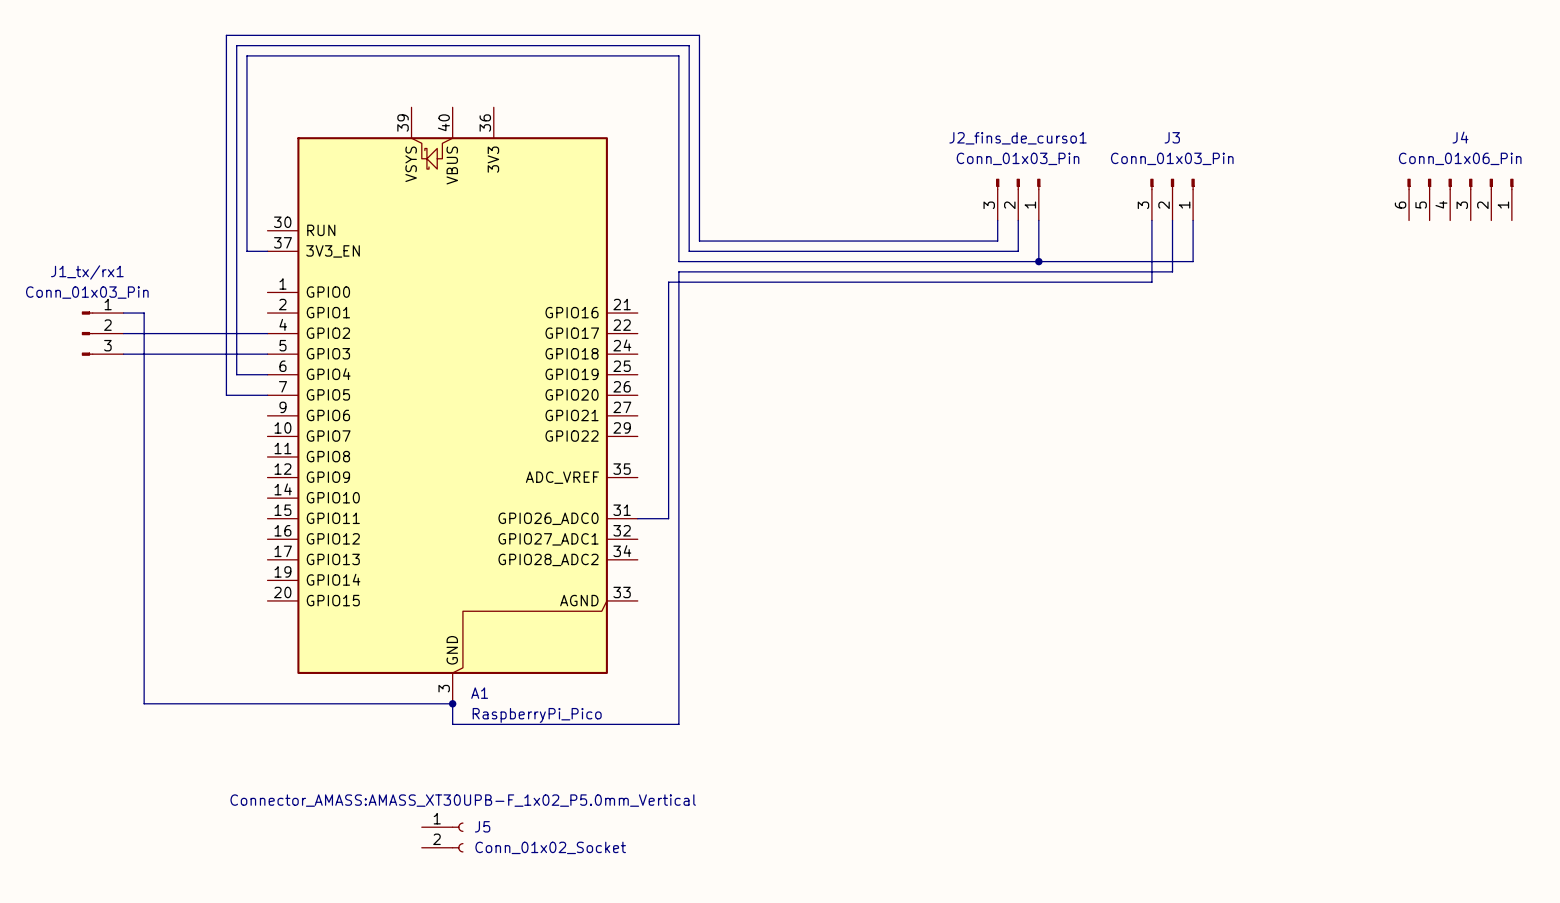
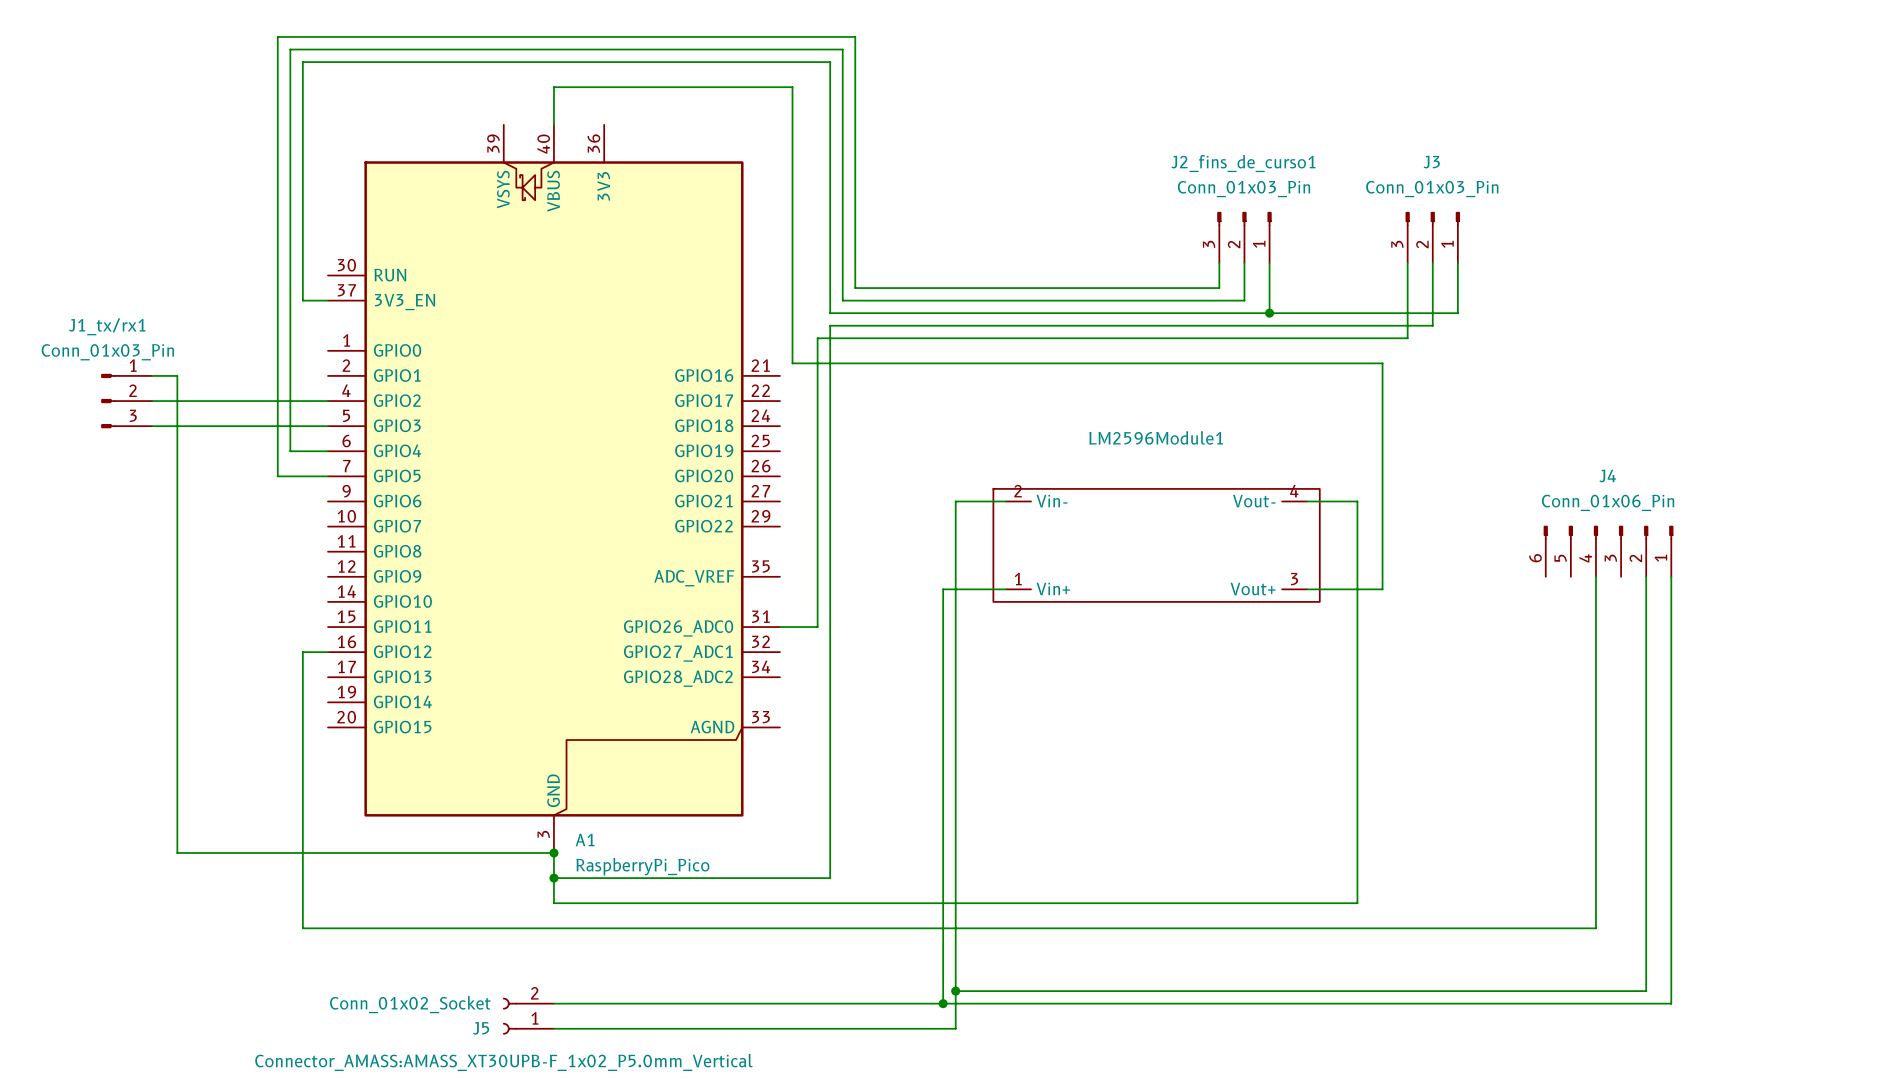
wire: none -> (553, 124) (553, 87) (792, 87) (792, 363) (1382, 363) (1382, 589) (1307, 589)
J4 position: (1460, 199) -> (1608, 551)
wire: none -> (1005, 501) (955, 501) (955, 1028) (553, 1028)
wire: none -> (1307, 501) (1357, 501) (1357, 903) (553, 903) (553, 878)
LM2596Module1: none -> (1156, 545)
wire: none -> (1595, 576) (1595, 928) (302, 928) (302, 652) (327, 652)
wire: none -> (1646, 576) (1646, 991) (955, 991)
wire: none -> (1671, 576) (1671, 1003) (553, 1003)
wire: none -> (1005, 589) (943, 589) (943, 1003)
junction: none -> (553, 878)
junction: none -> (955, 991)
junction: none -> (943, 1003)
J5 rotation: 0° (457, 837) -> 180° (510, 1016)

